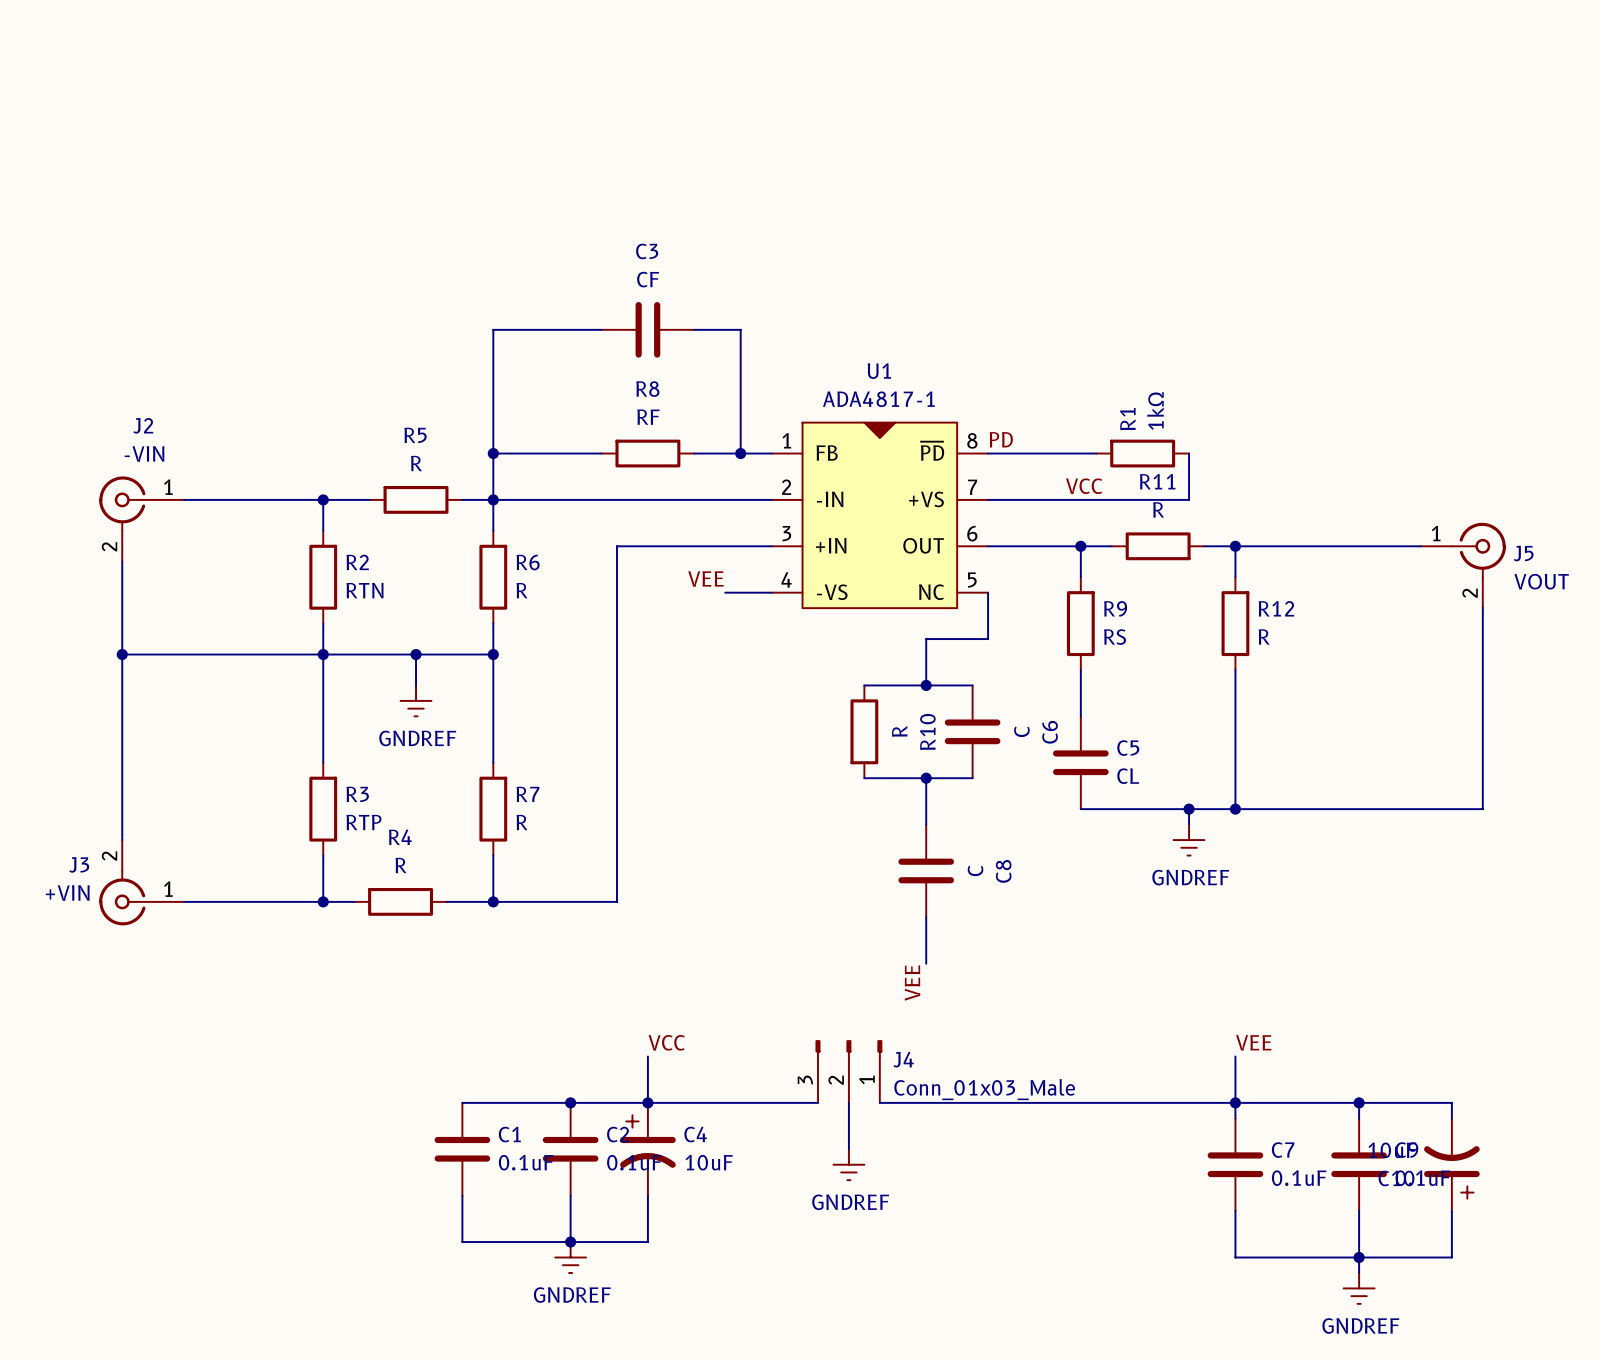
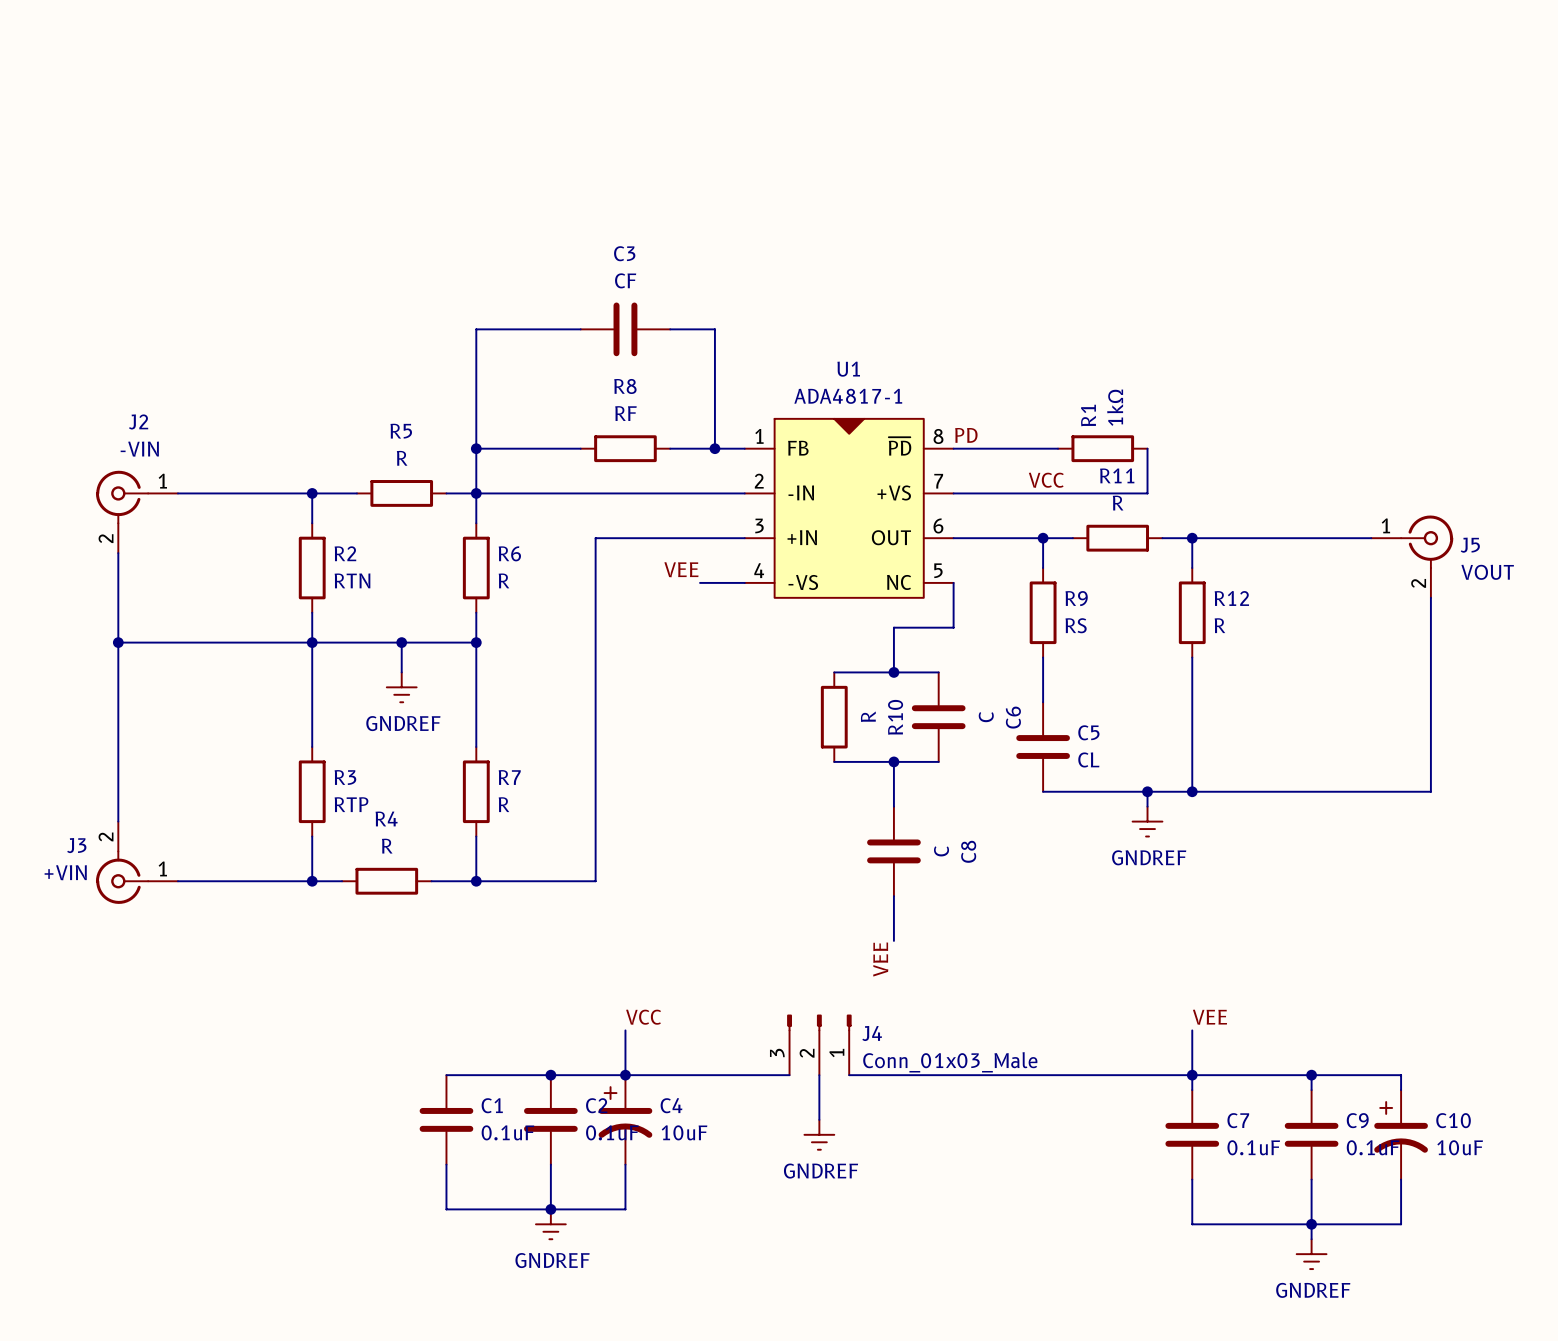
C10 rotation: 0° (1451, 1172) -> 180° (1401, 1127)

